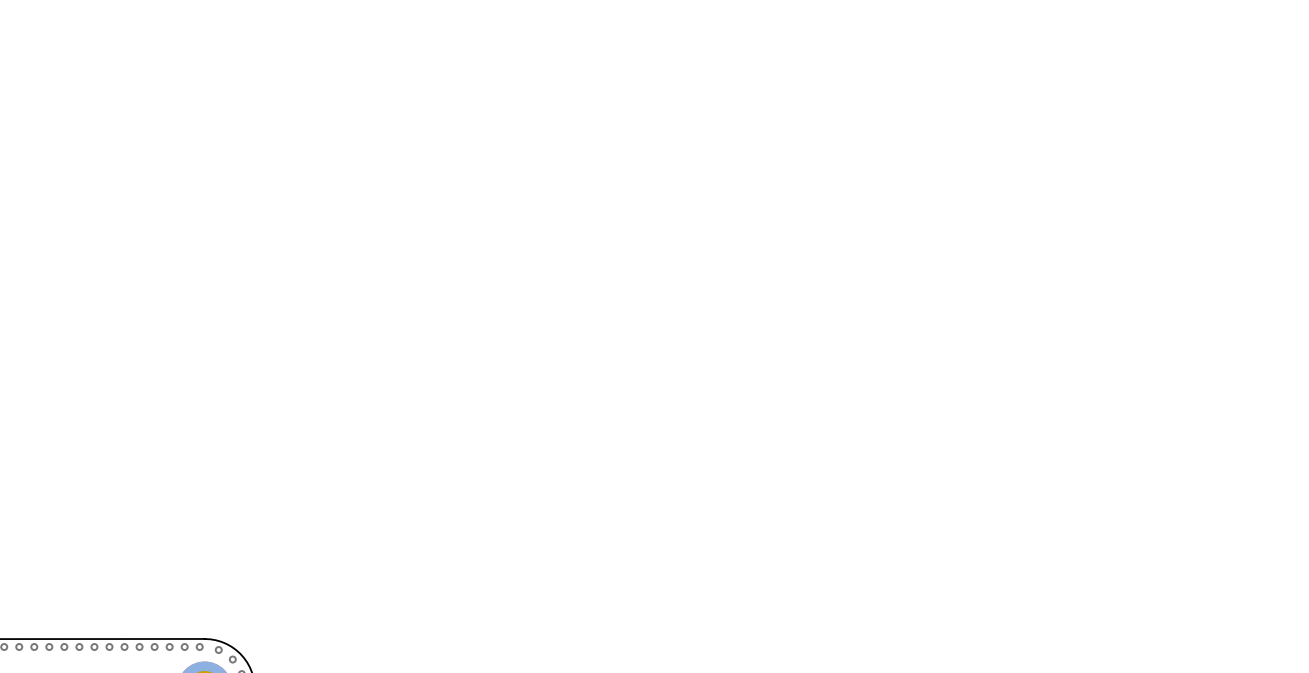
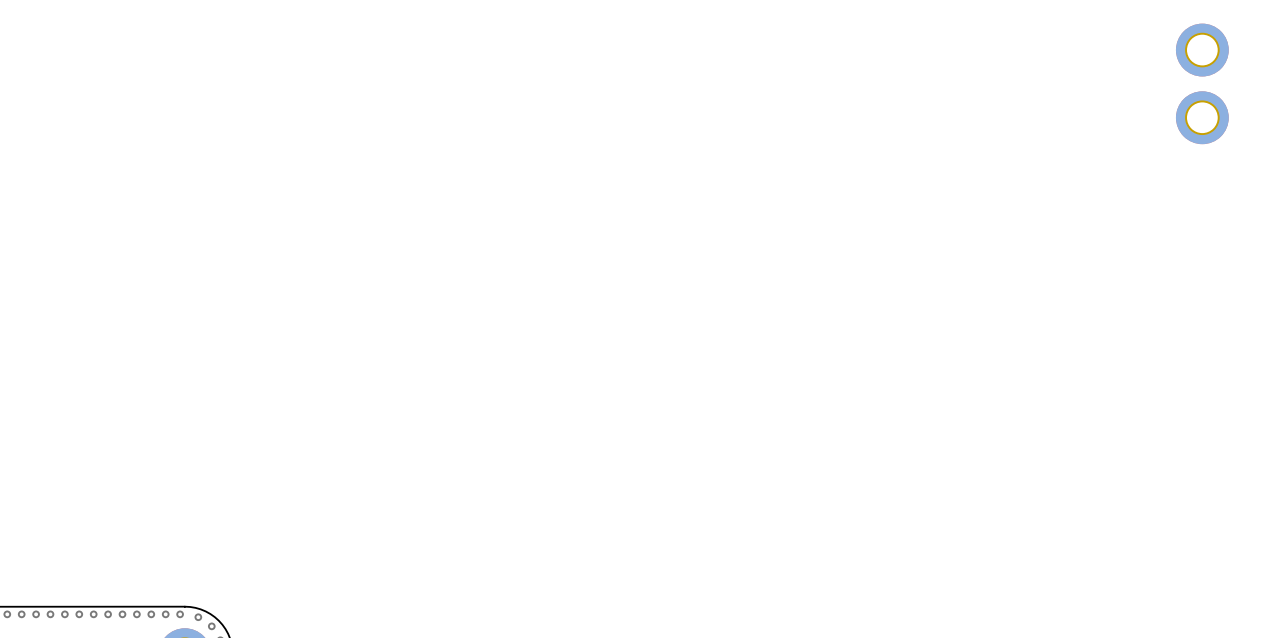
part: none -> (1202, 50)
part: none -> (1202, 117)

